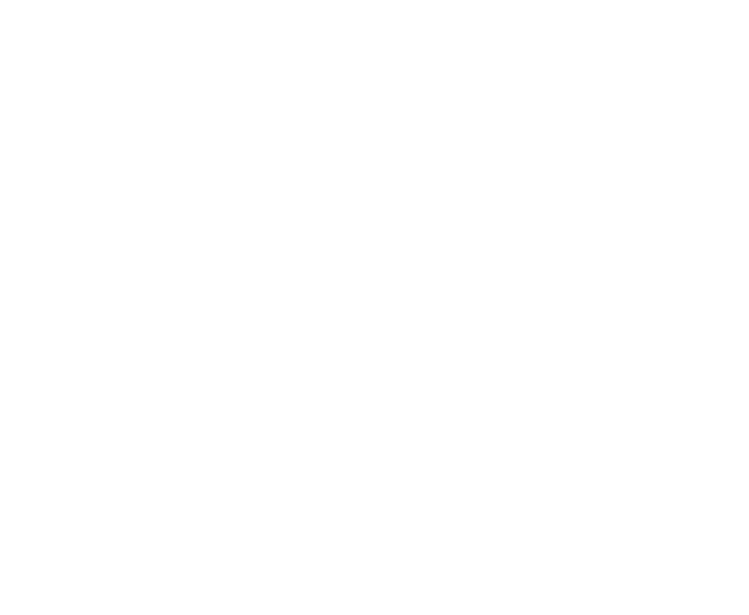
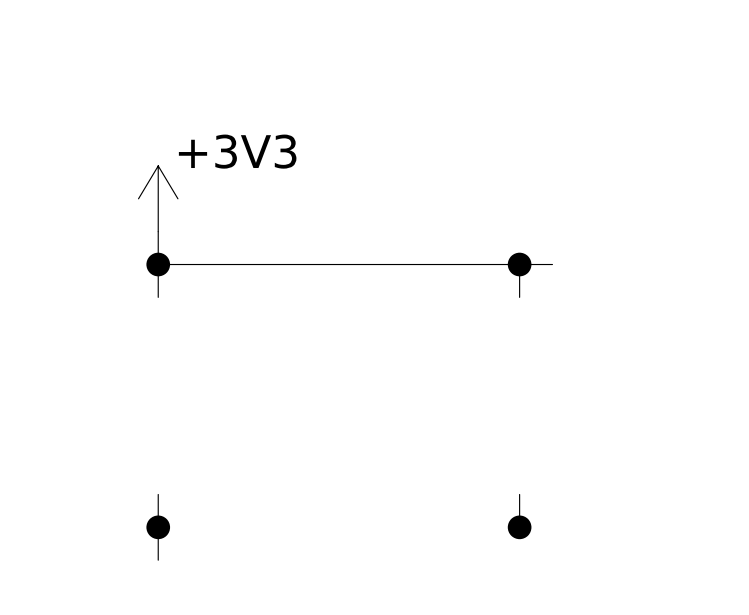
power symbol: none -> +3V3 (158, 198)
wire: none -> (158, 231) (158, 297)
wire: none -> (158, 264) (552, 264)
junction: none -> (158, 264)
wire: none -> (519, 264) (519, 297)
junction: none -> (519, 264)
wire: none -> (158, 494) (158, 560)
wire: none -> (519, 494) (519, 527)
junction: none -> (158, 527)
junction: none -> (519, 527)

